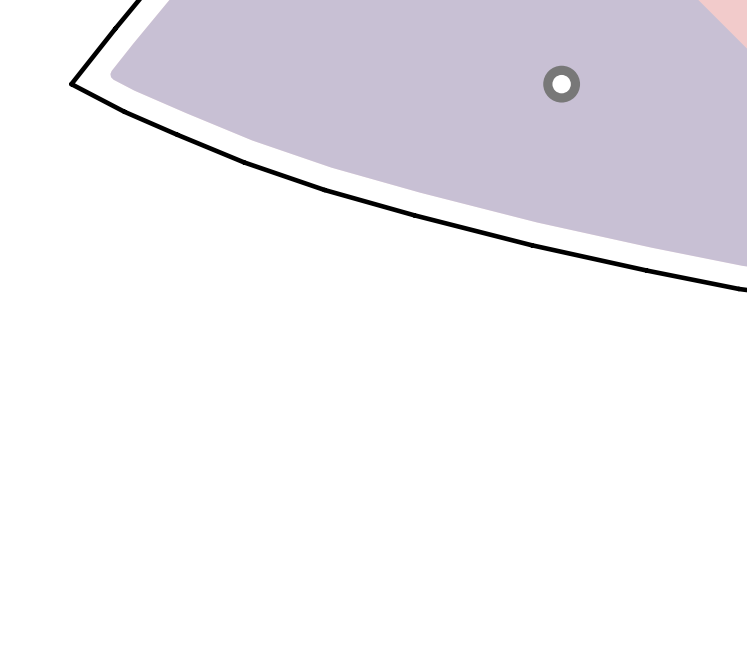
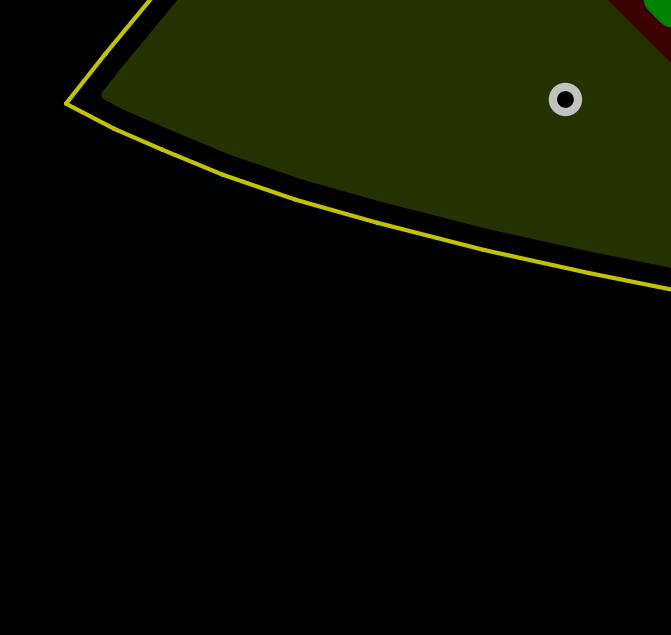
via position: (561, 84) -> (565, 99)

